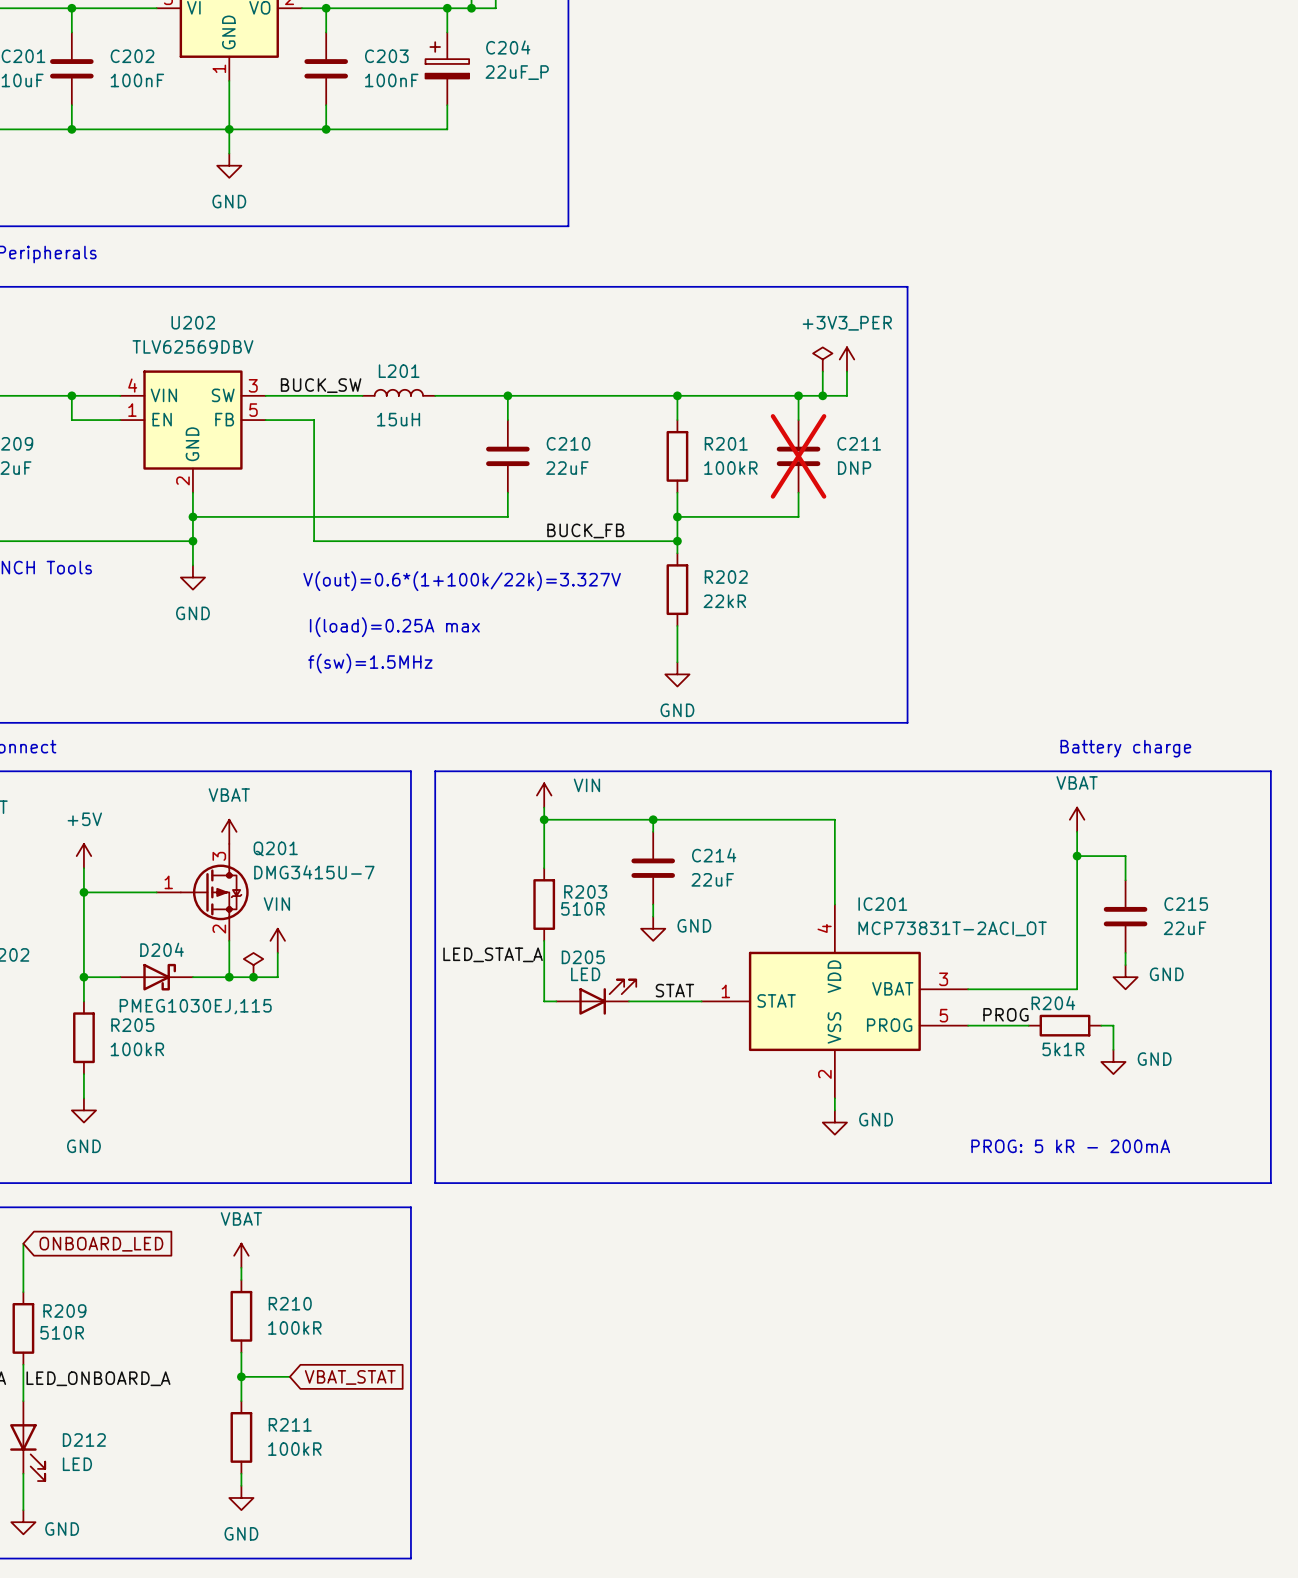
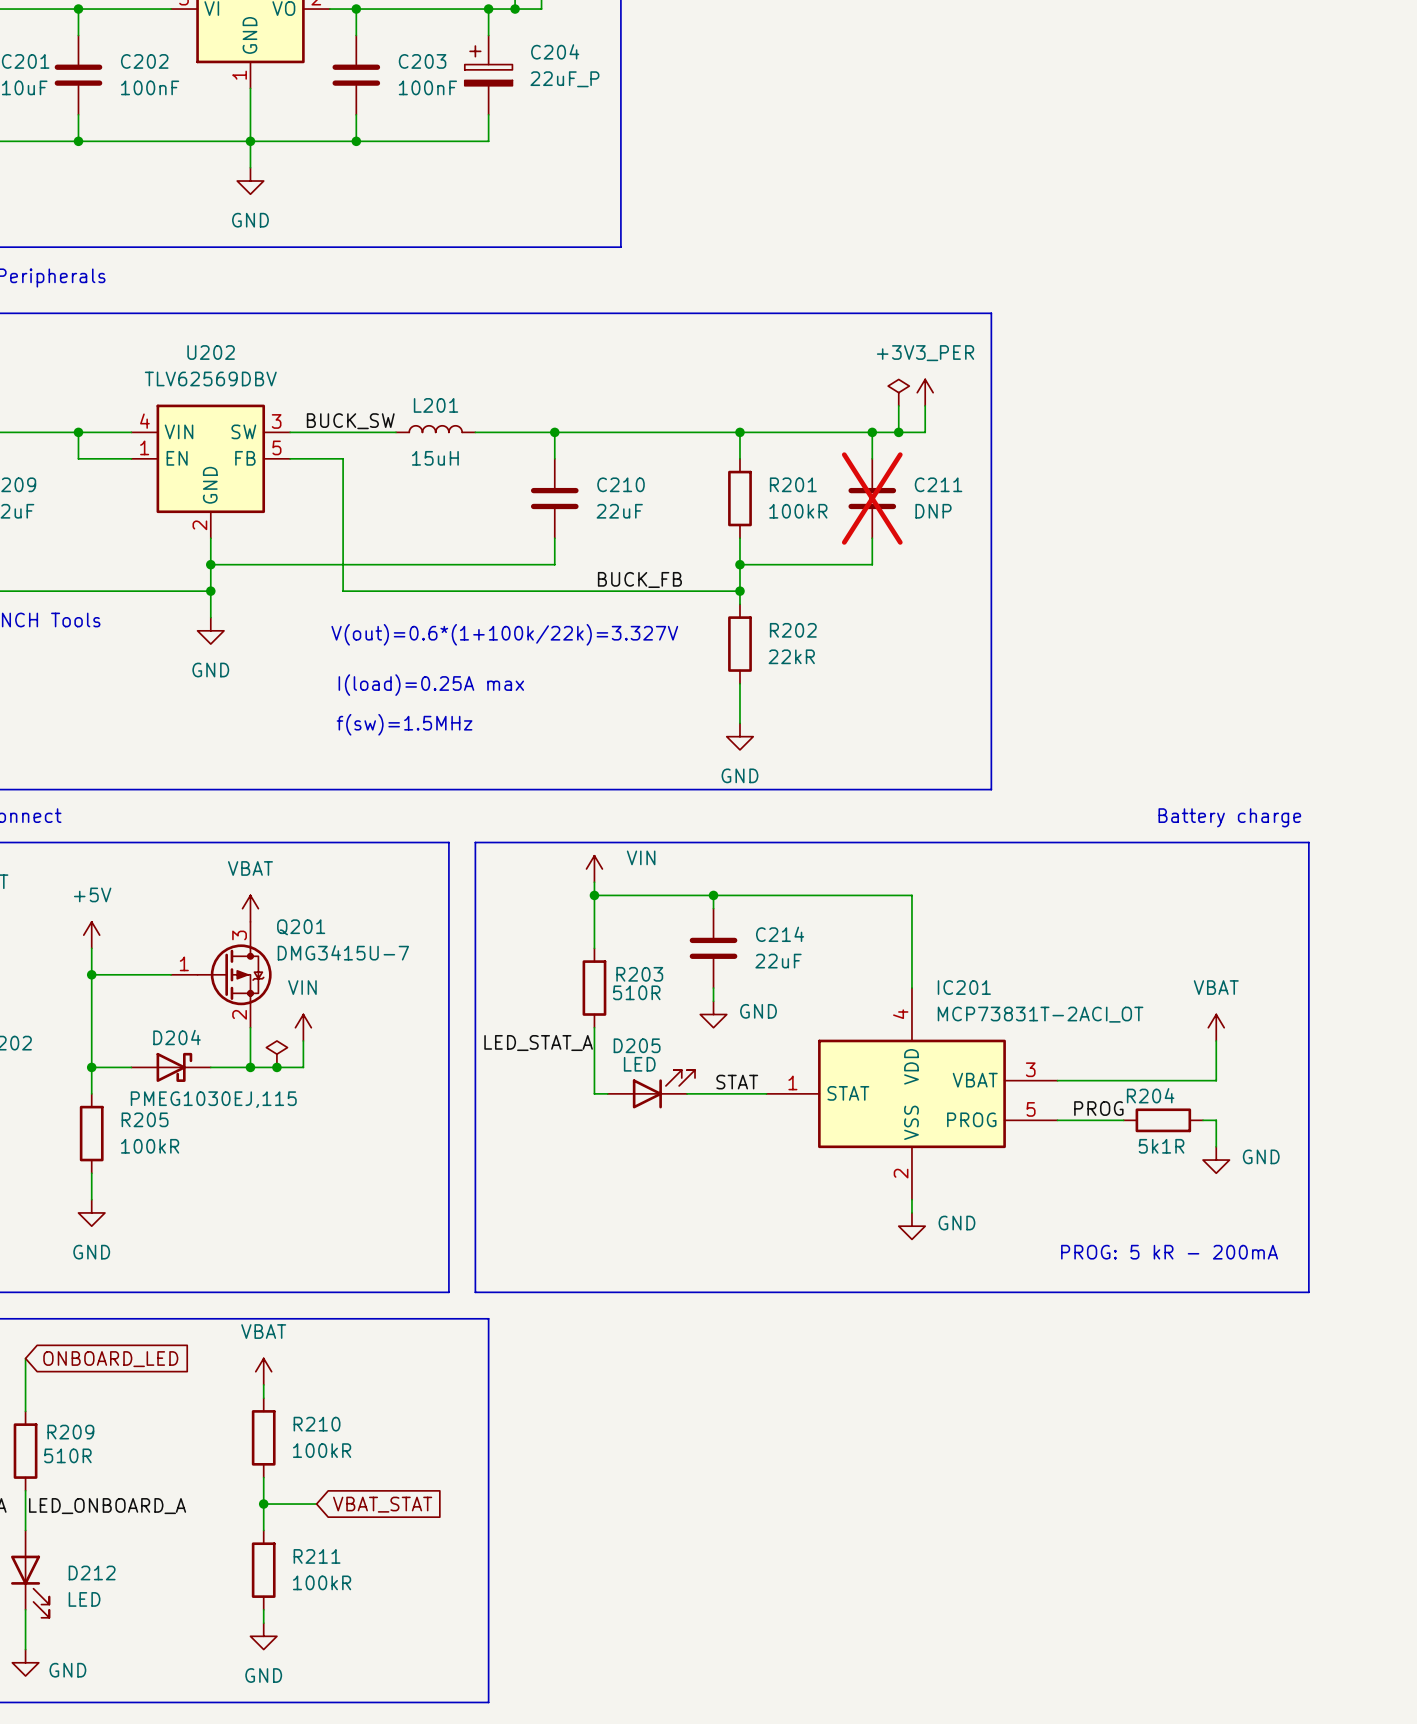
line: (1198, 771) (1270, 771) (1270, 1183) (1198, 1183) -> (1308, 842) (1308, 1292)
power symbol position: VBAT (1077, 819) -> VBAT (1216, 1027)
wire: (1077, 831) (1077, 989) -> (1216, 1040) (1216, 1080) (1176, 1080)
wire: (1077, 856) (1125, 856) (1125, 880) -> none
junction: (1077, 856) -> none
C215: 22uF (1125, 916) -> none
wire: (1125, 952) (1125, 965) -> none
power symbol: GND (1125, 977) -> none
line: (410, 1207) (410, 1558) -> (448, 1318) (488, 1318) (488, 1702) (448, 1702)

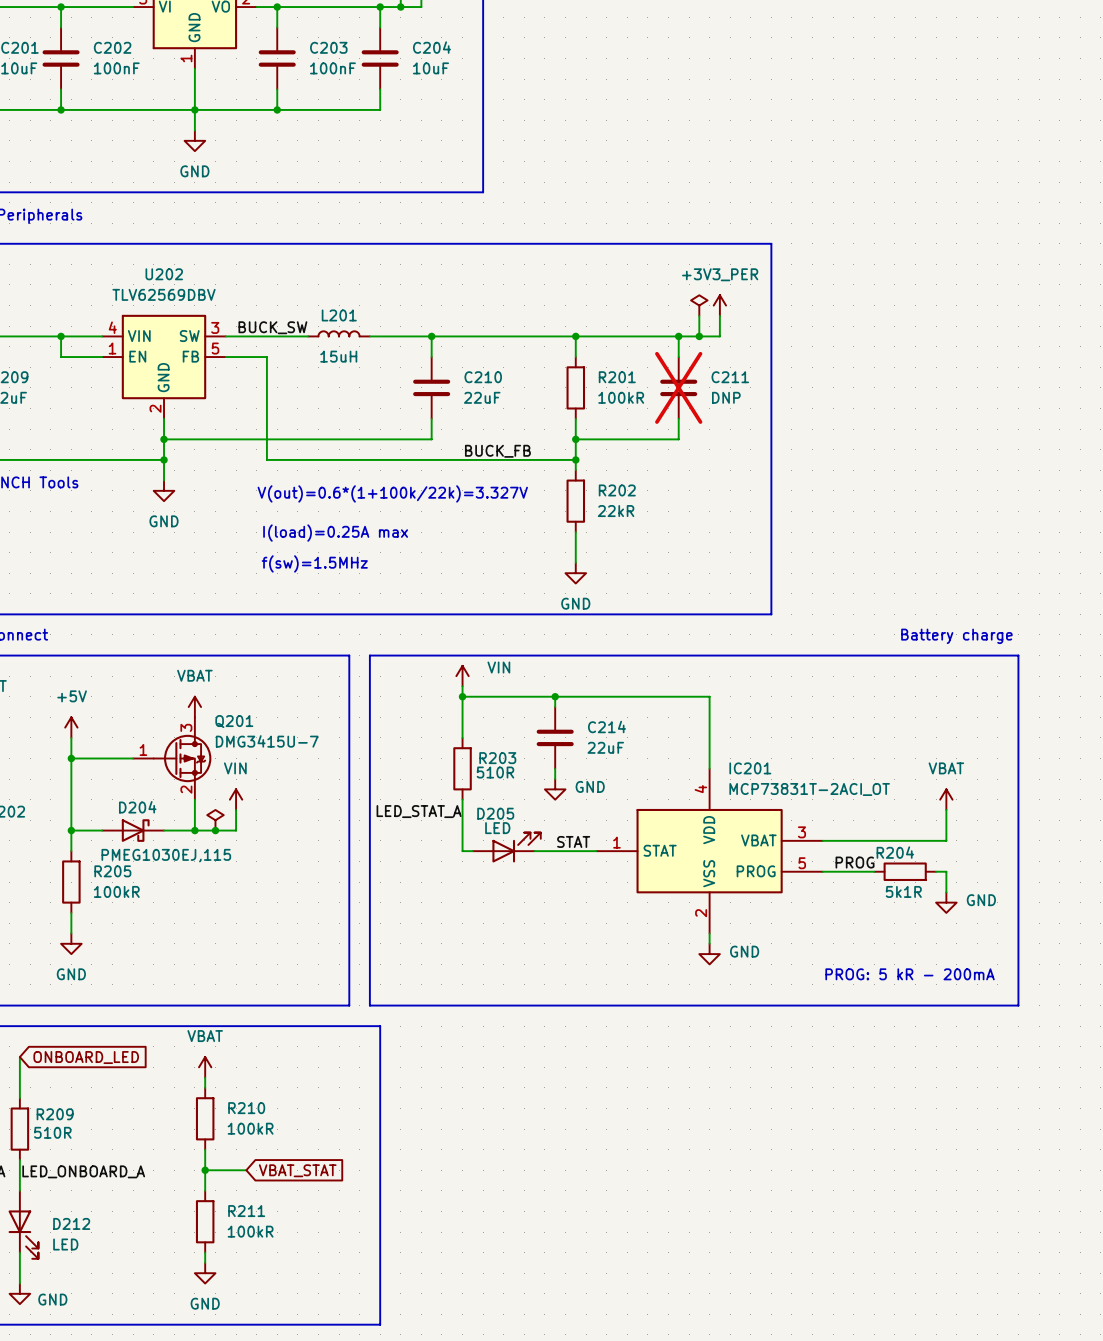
C204 symbol: [464, 35, 513, 115] -> [361, 27, 399, 90]
C204 value: 22uF_P (564, 79) -> 10uF (431, 68)

